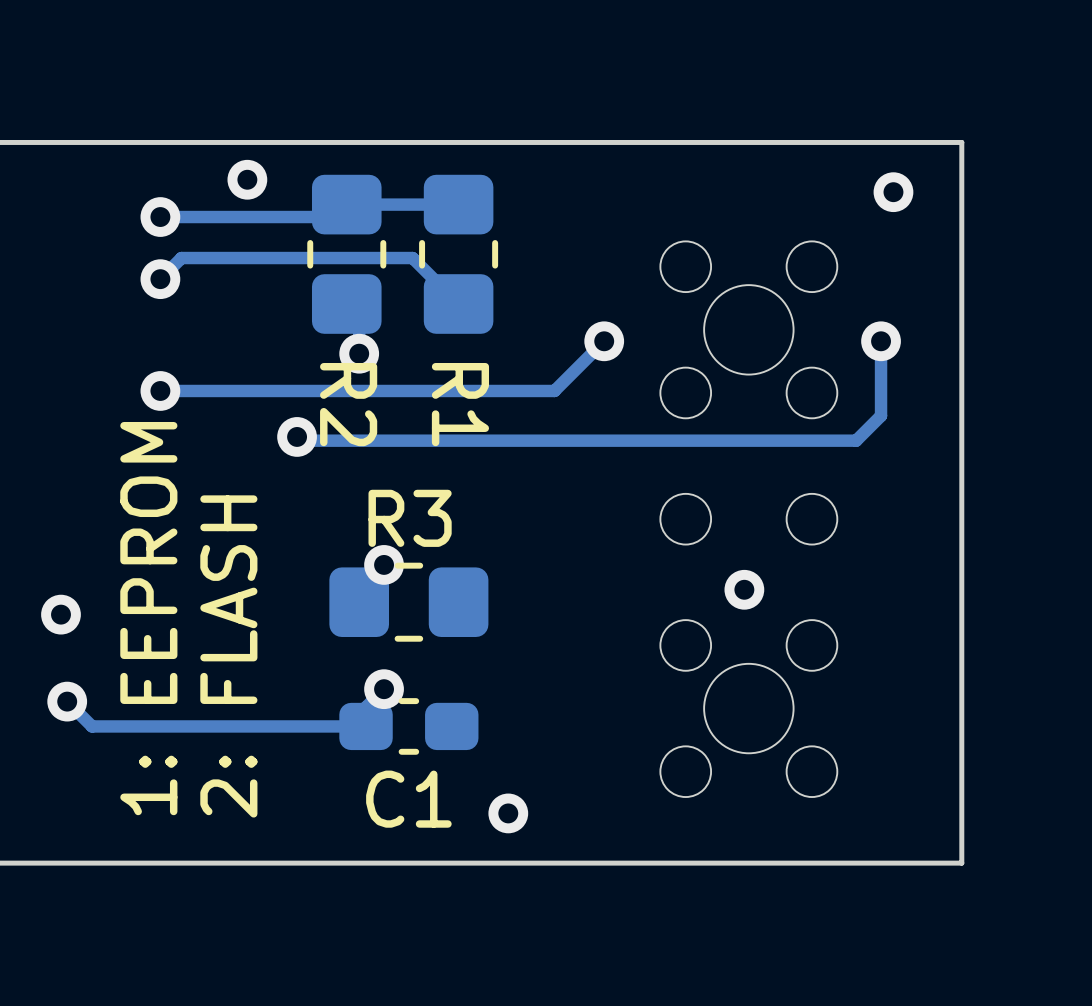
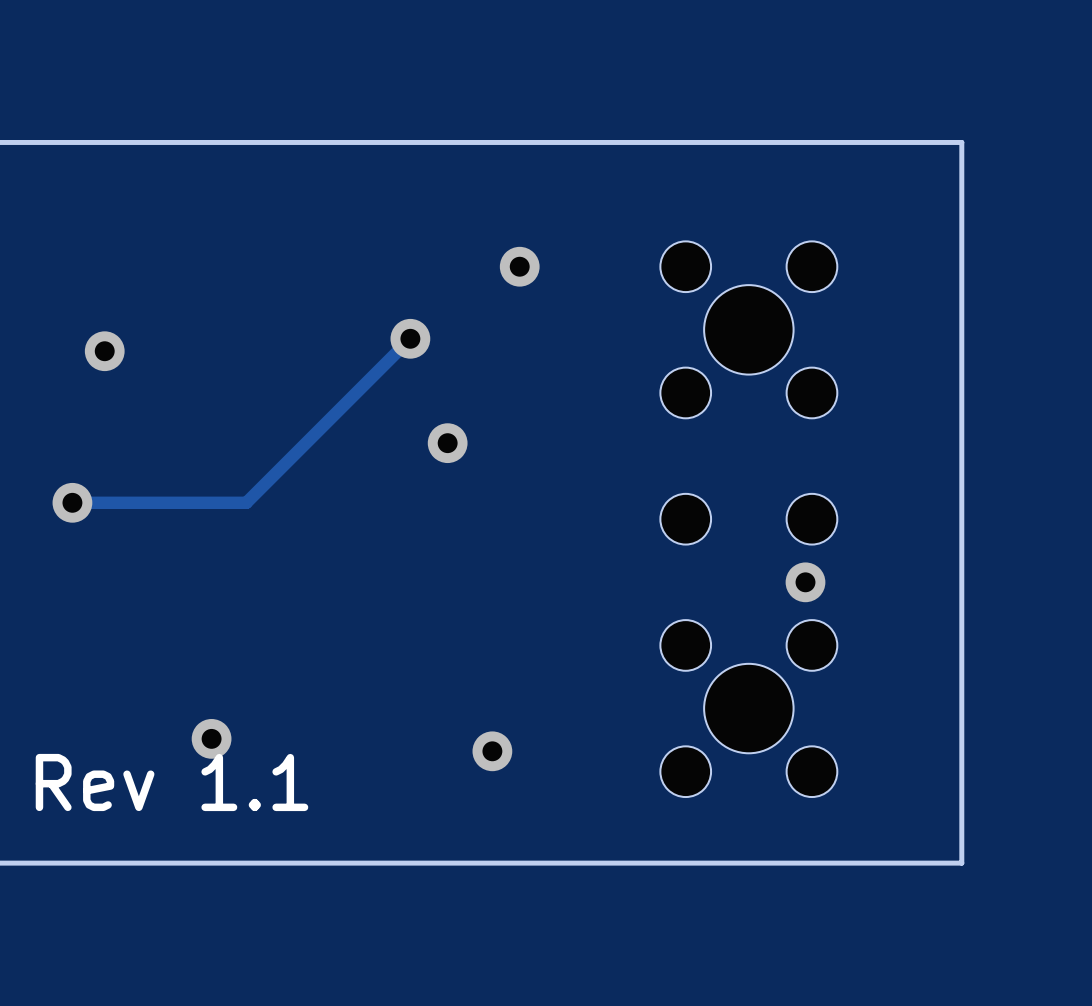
via: (247, 179) -> none
via: (893, 192) -> none
track: (458, 204) (346, 204) (334, 217) (160, 217) -> none
via: (160, 217) -> none
R2: (346, 254) -> none
R1: (458, 254) -> none
via: none -> (519, 266)
track: (160, 279) (181, 258) (412, 258) (458, 304) -> none
via: (160, 279) -> none
track: none -> (410, 338) (246, 502) (72, 502)
track: (604, 341) (554, 390) (160, 390) -> none
via: (604, 341) -> none
track: (881, 341) (881, 415) (856, 440) (300, 440) (297, 436) -> none
via: (881, 341) -> none
via: none -> (104, 351)
via position: (359, 353) -> (410, 338)
via: (160, 390) -> none
via: (297, 436) -> none
via: none -> (447, 443)
via: none -> (72, 502)
via: (384, 564) -> none
via position: (744, 589) -> (805, 582)
R3: (408, 602) -> none
via: (60, 614) -> none
text: 1: EEPROM (148, 618) -> none
text: 2: FLASH (228, 656) -> none
track: (384, 689) (366, 707) (366, 726) (92, 726) (67, 701) -> none
via: (384, 689) -> none
via: (67, 701) -> none
C1: (408, 726) -> none
via: none -> (211, 738)
via: none -> (492, 751)
text: none -> Rev 1.1 (172, 782)
via: (508, 813) -> none

